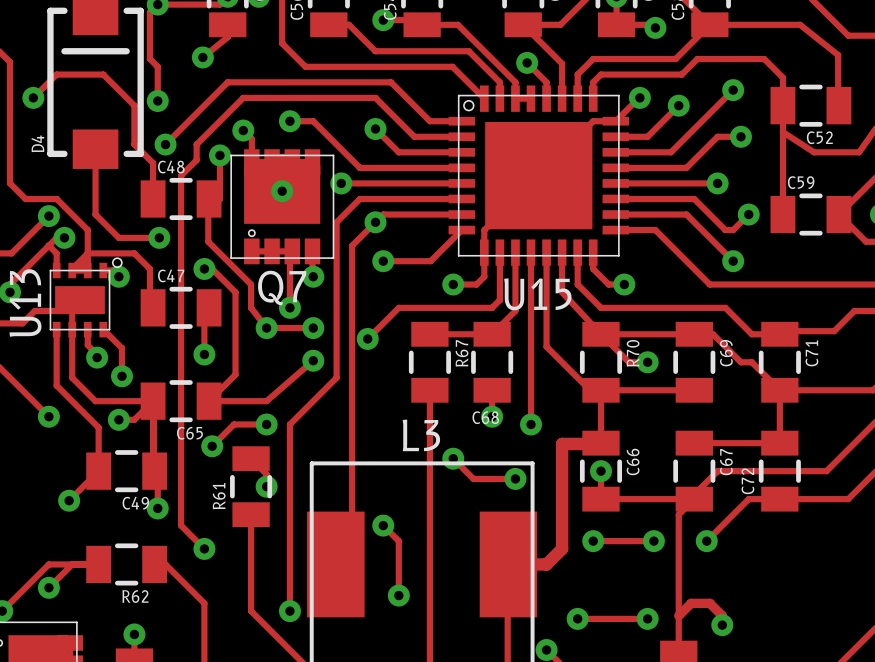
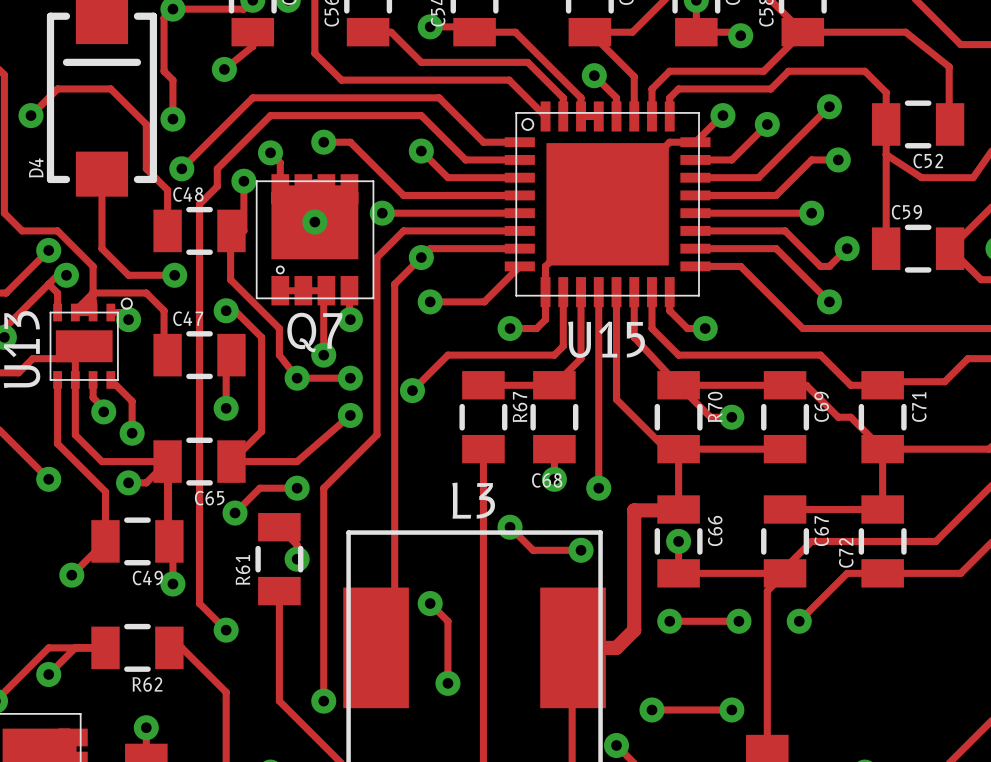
track: (678, 615) (691, 603) (709, 603) (722, 615) (722, 625) -> none
via: (722, 625) -> none

